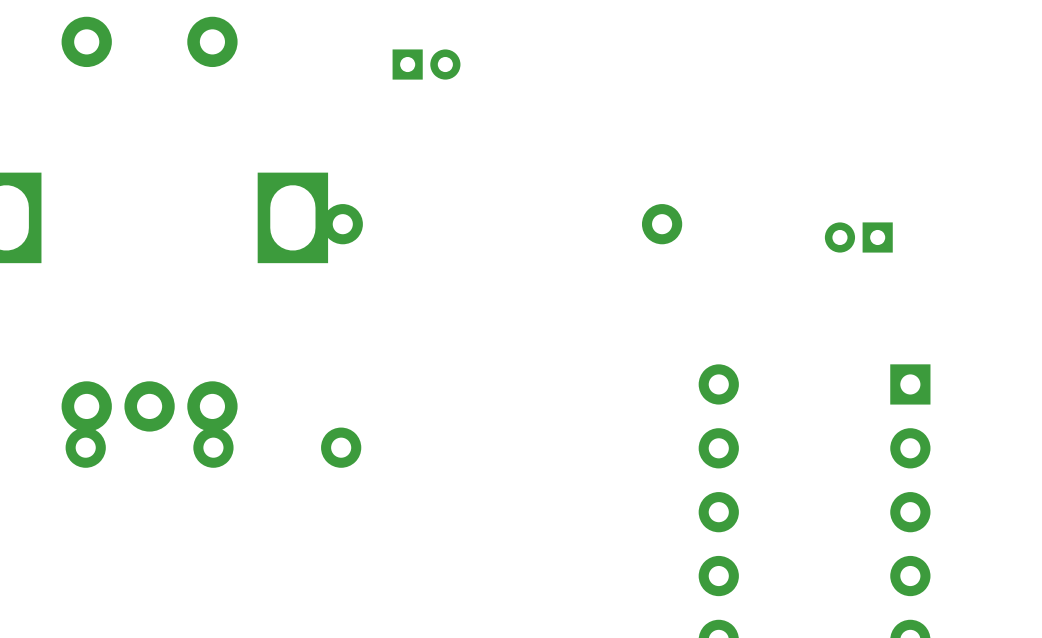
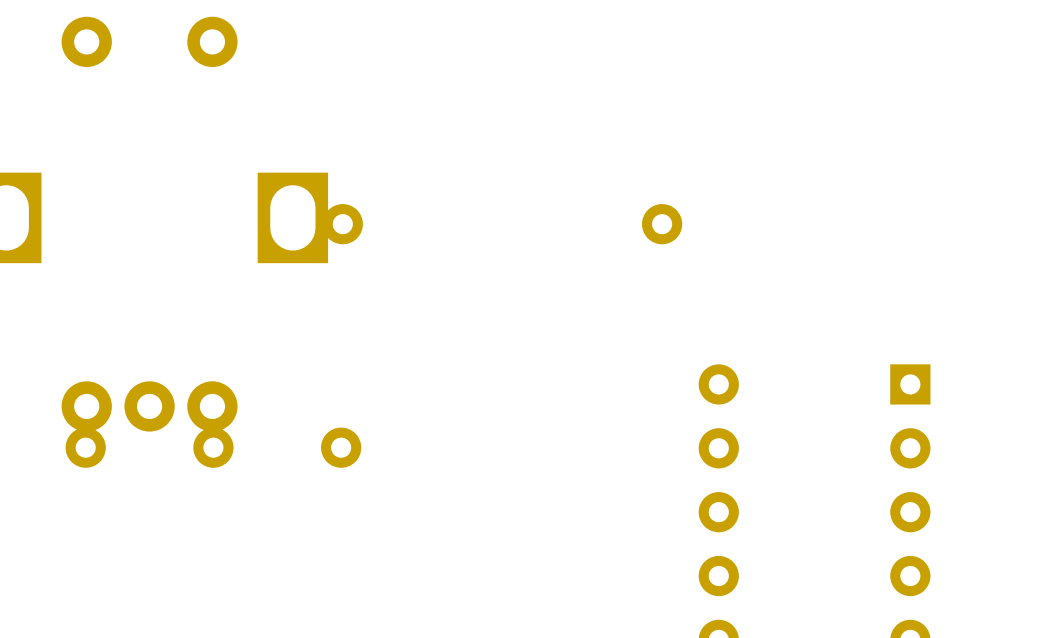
part: (426, 64) -> none
part: (858, 237) -> none

